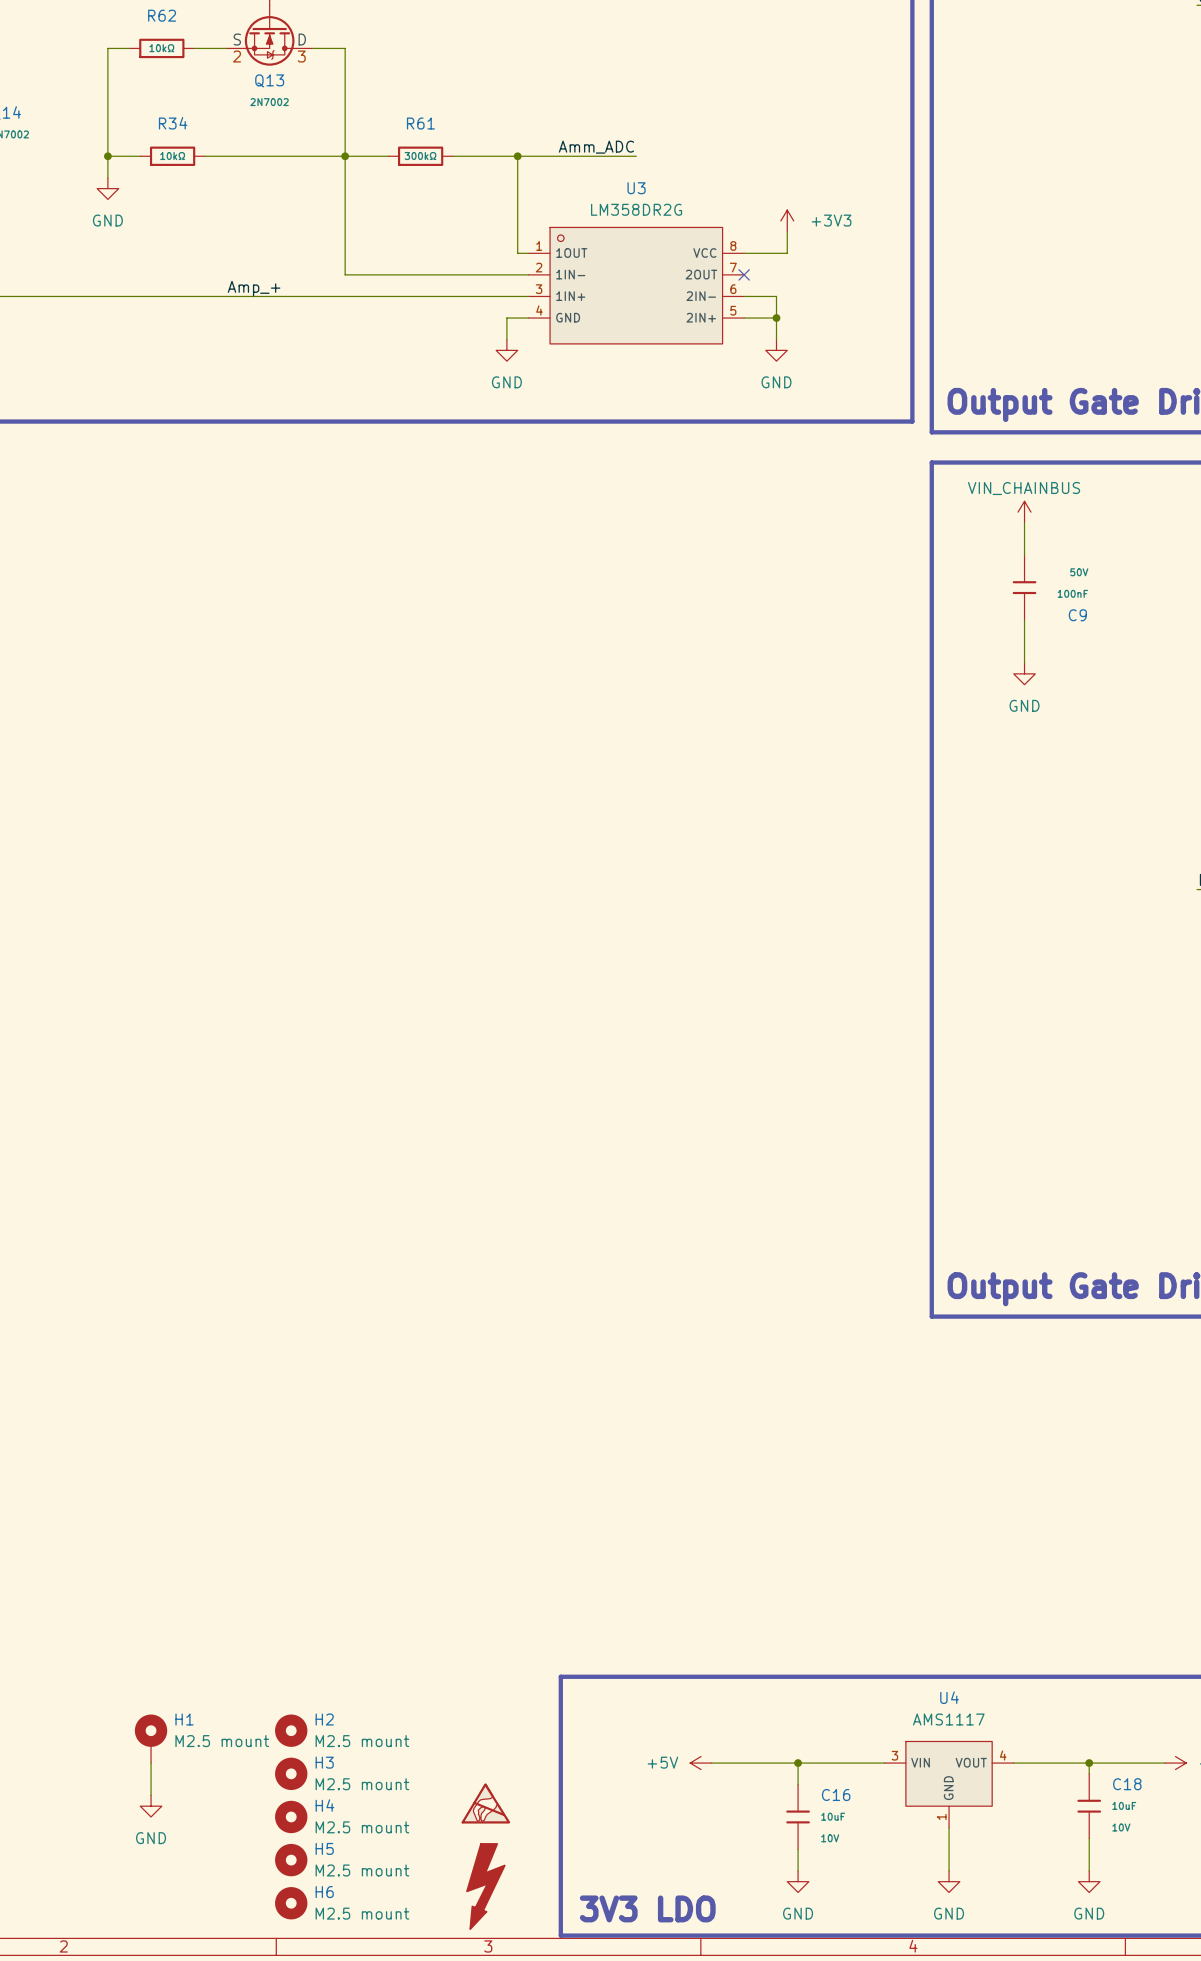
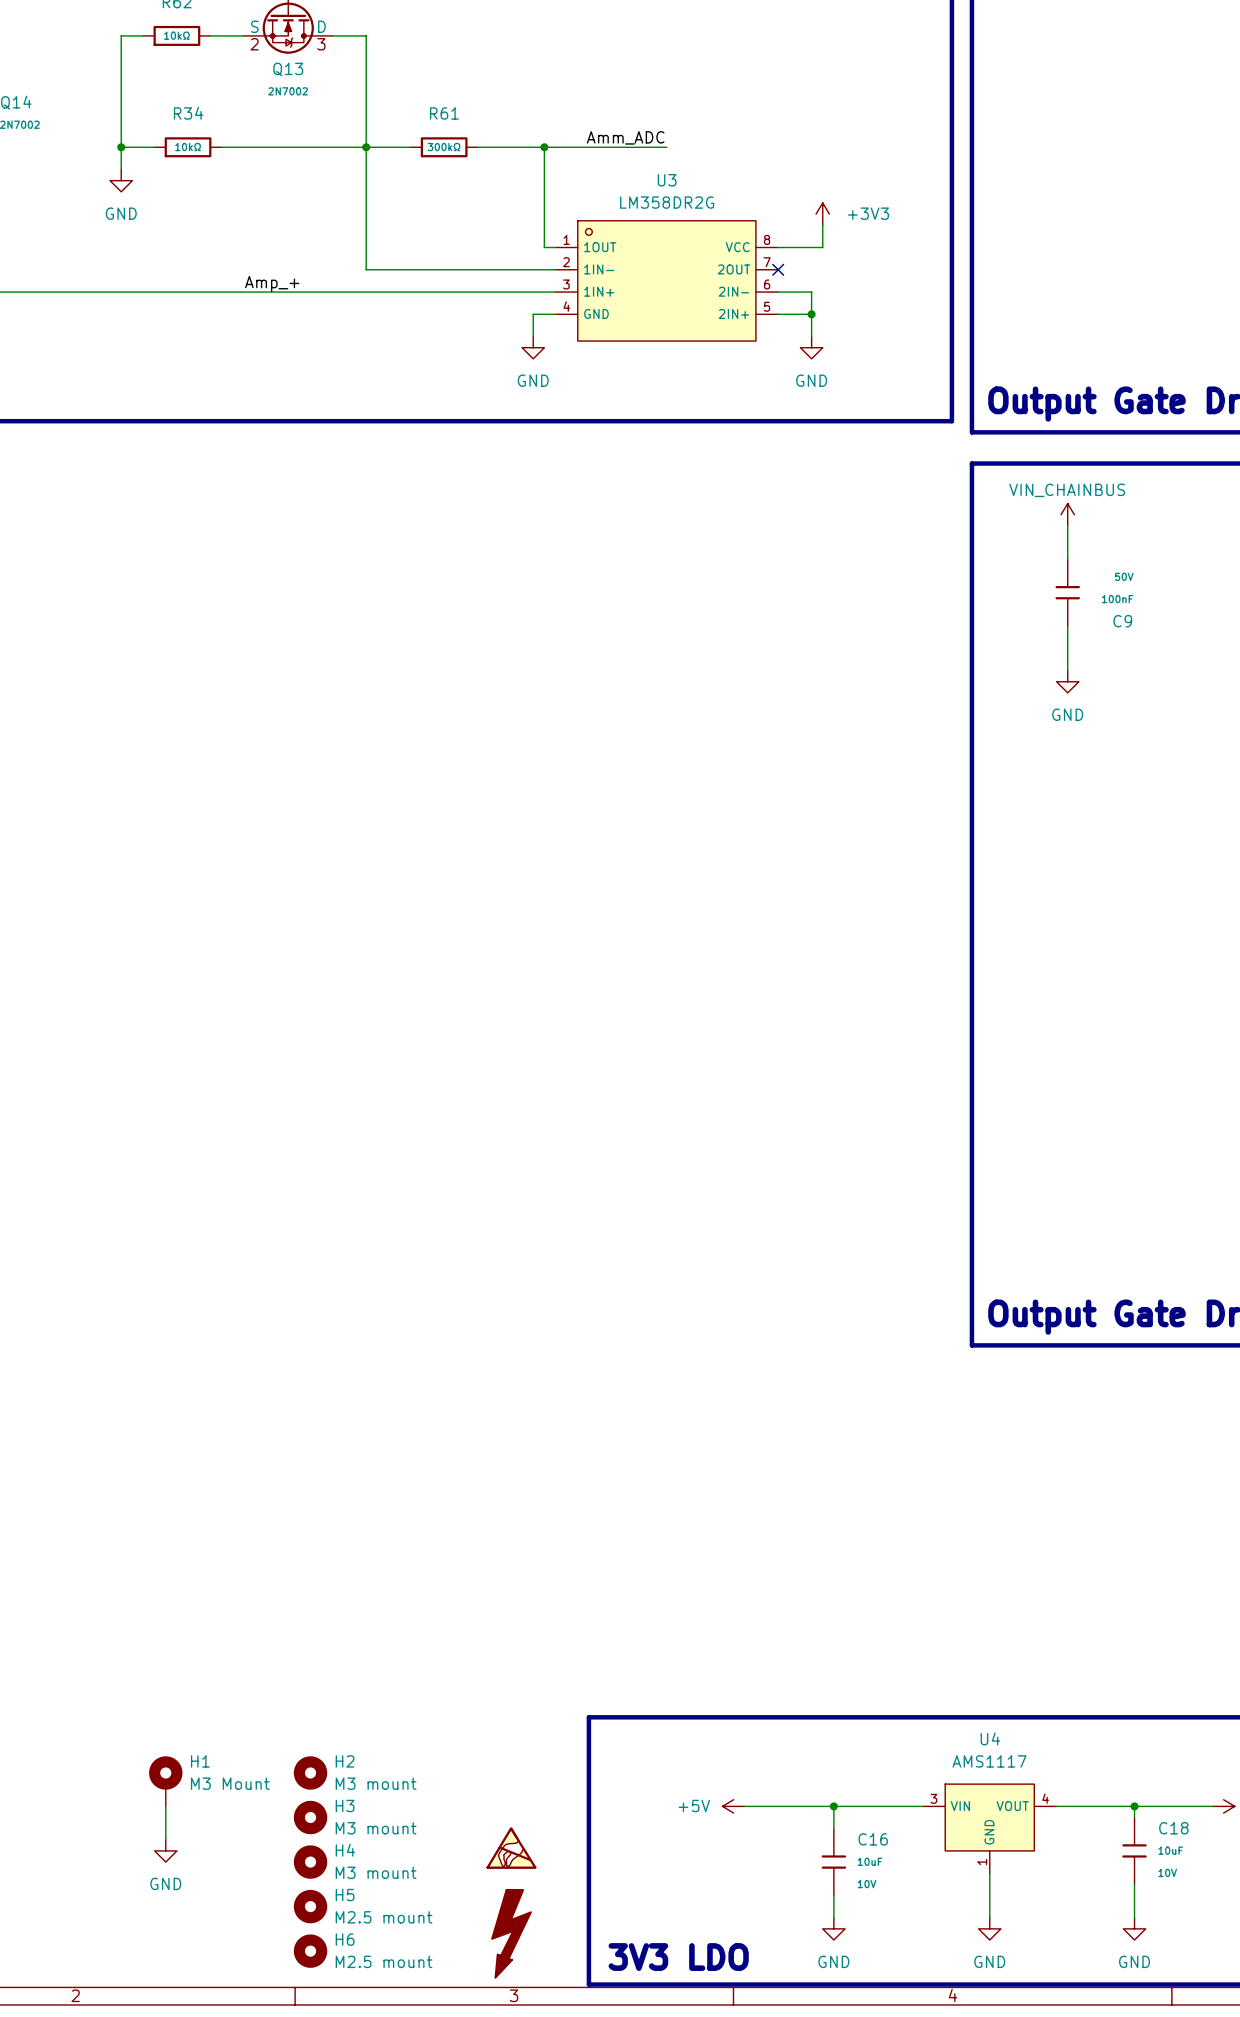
H1 value: M2.5 mount (222, 1741) -> M3 Mount (230, 1783)
H2 value: M2.5 mount (362, 1741) -> M3 mount (376, 1783)
H3 value: M2.5 mount (362, 1784) -> M3 mount (376, 1828)
H4 value: M2.5 mount (362, 1827) -> M3 mount (376, 1872)

